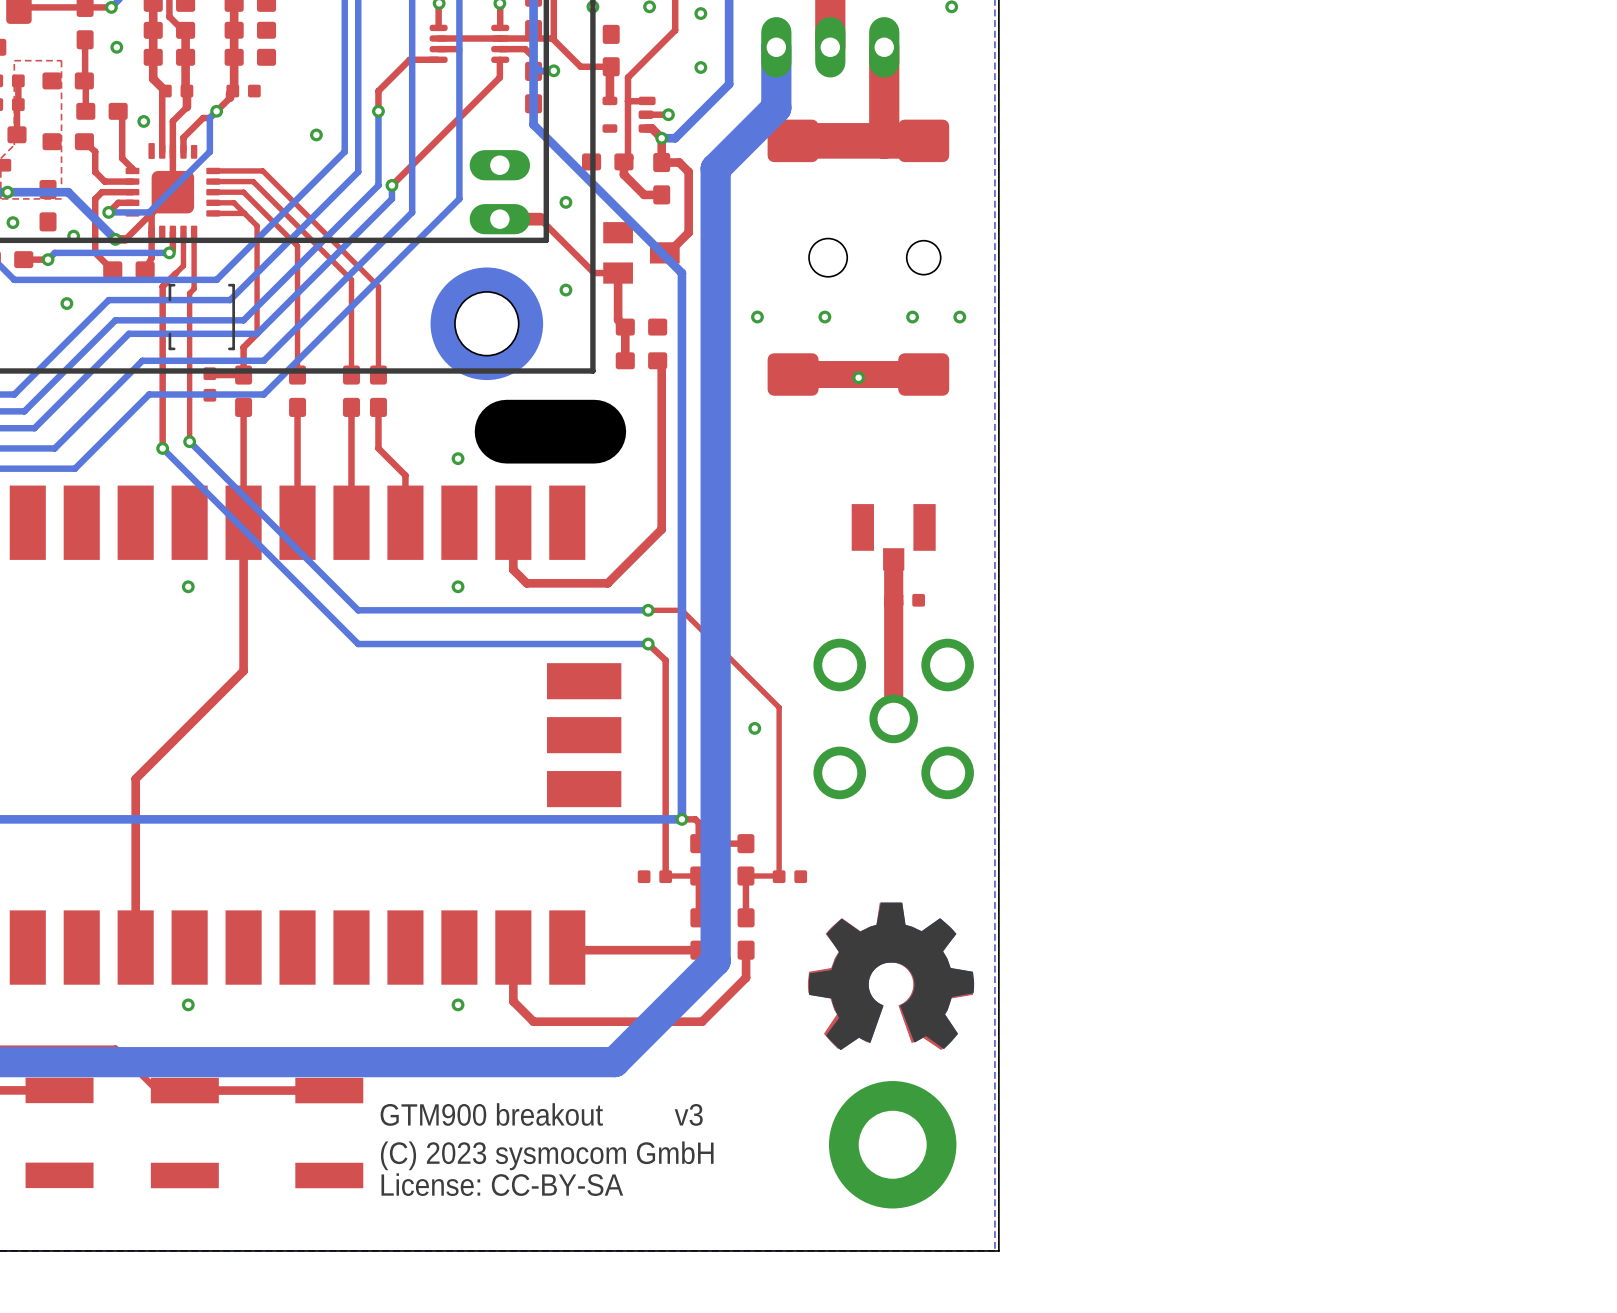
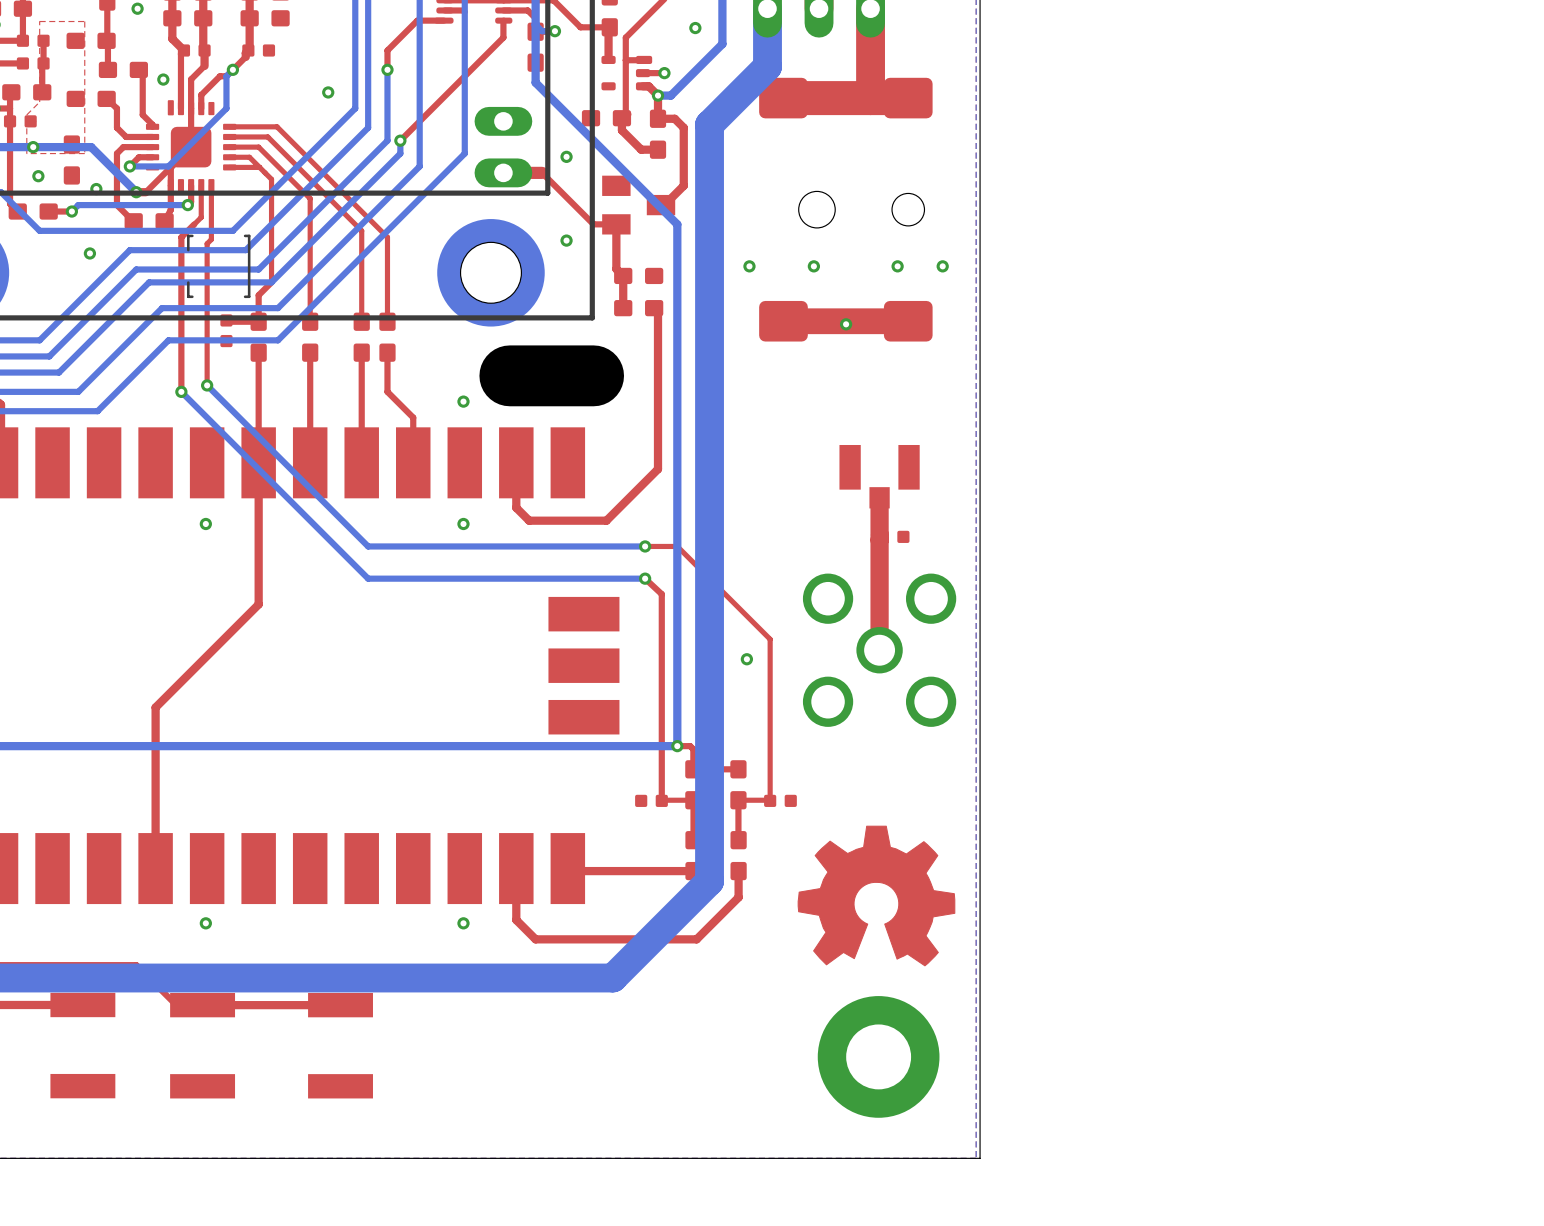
drawing: [808, 902, 975, 1050] -> none
text: GTM900 breakout (491, 1114) -> none
text: v3 (688, 1114) -> none
text: (C) 2023 sysmocom GmbH (547, 1155) -> none
text: License: CC-BY-SA (502, 1184) -> none

